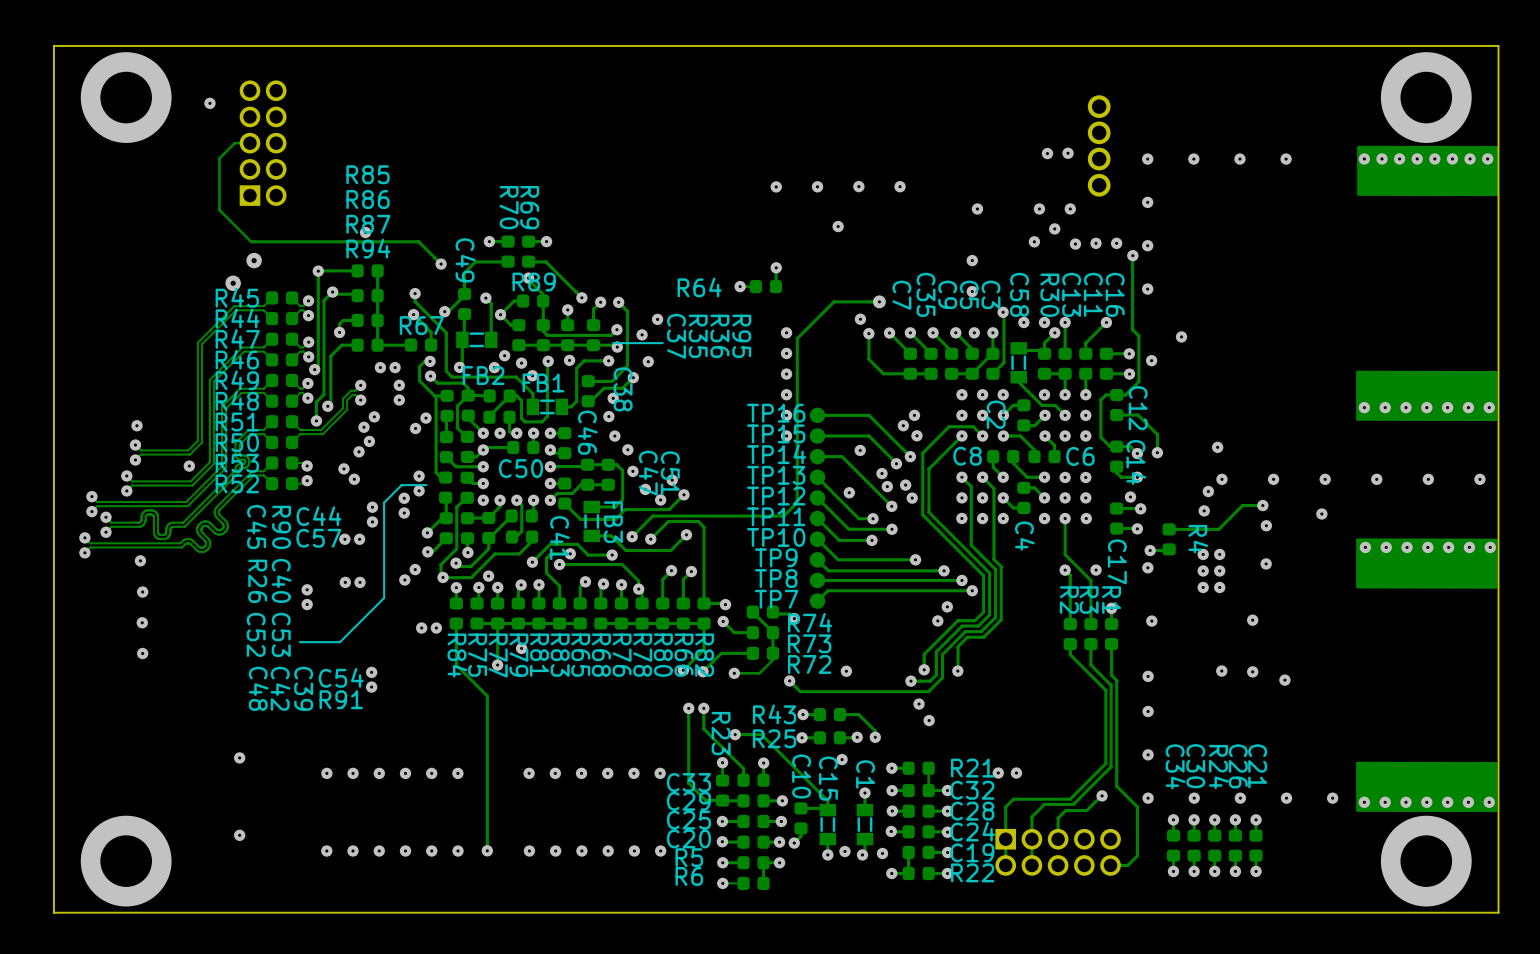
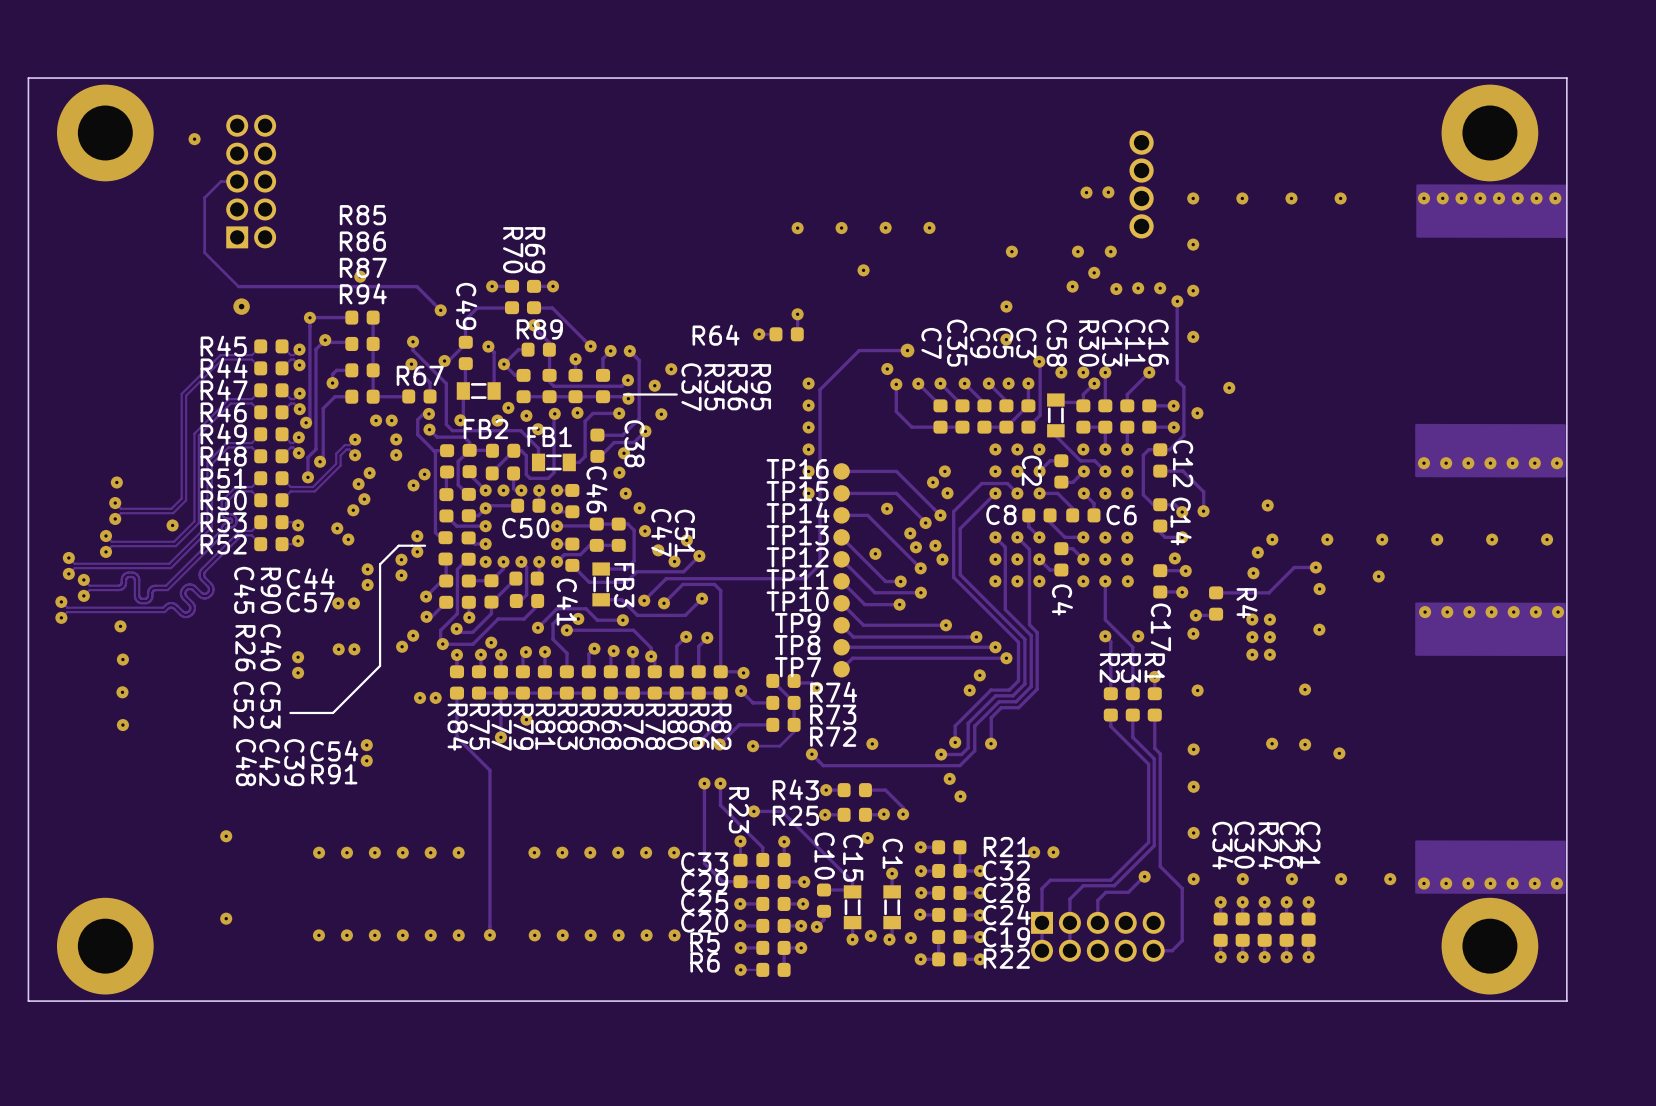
via: (233, 283) -> none

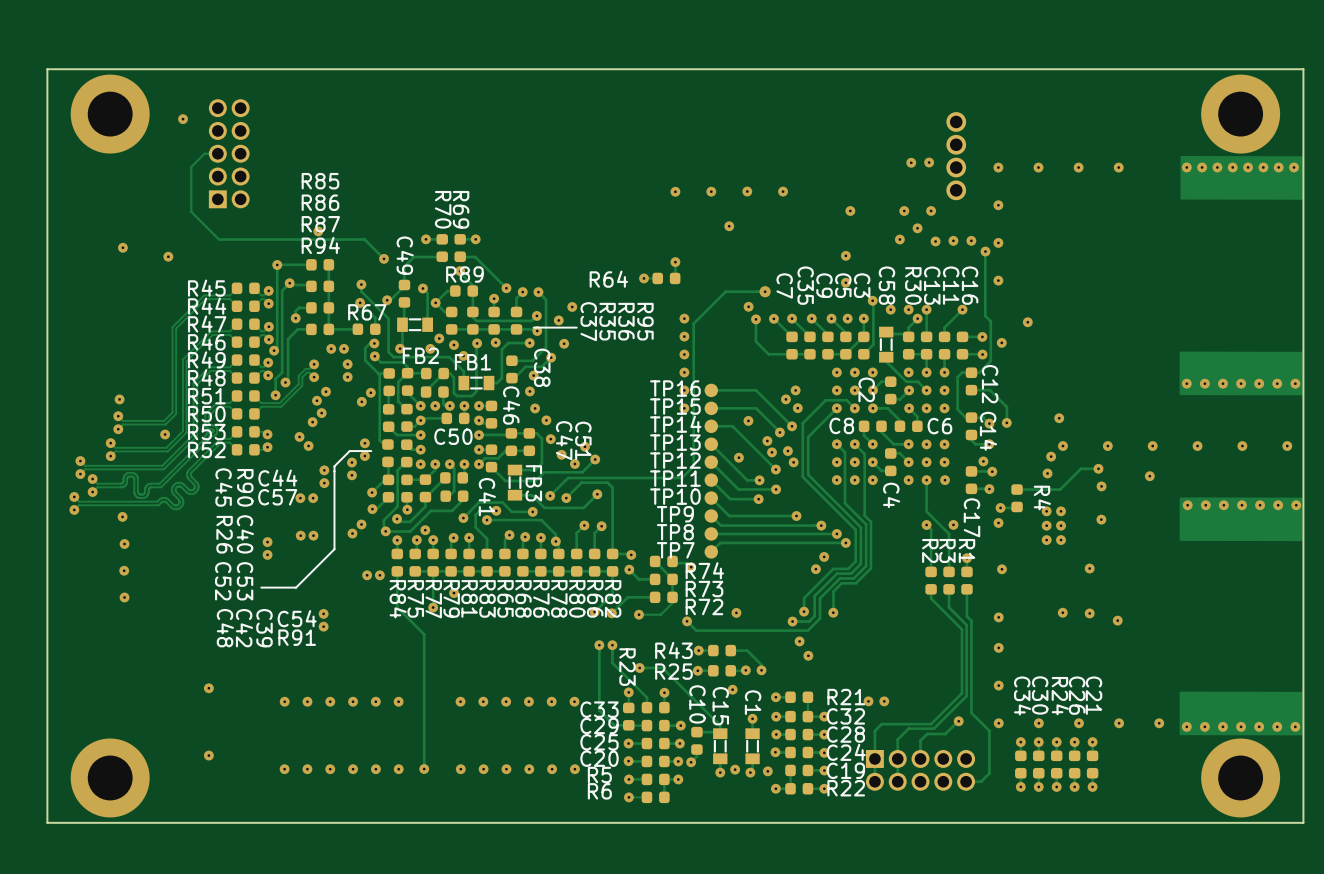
via: none -> (122, 247)
via: (241, 306) -> none
via: none -> (168, 256)

